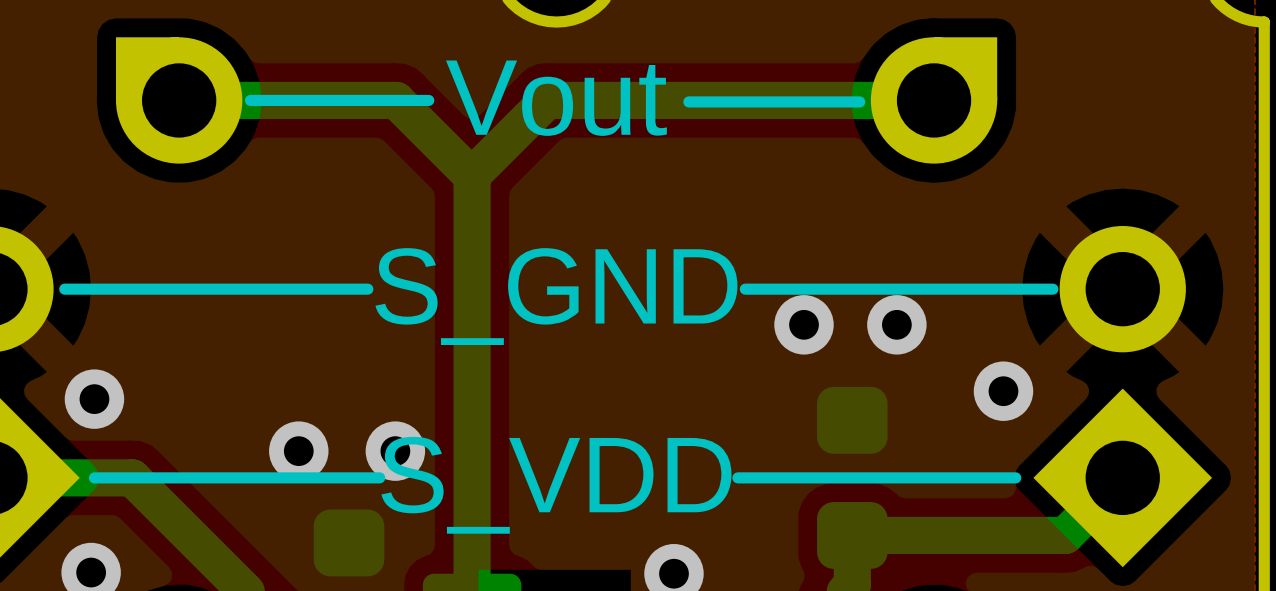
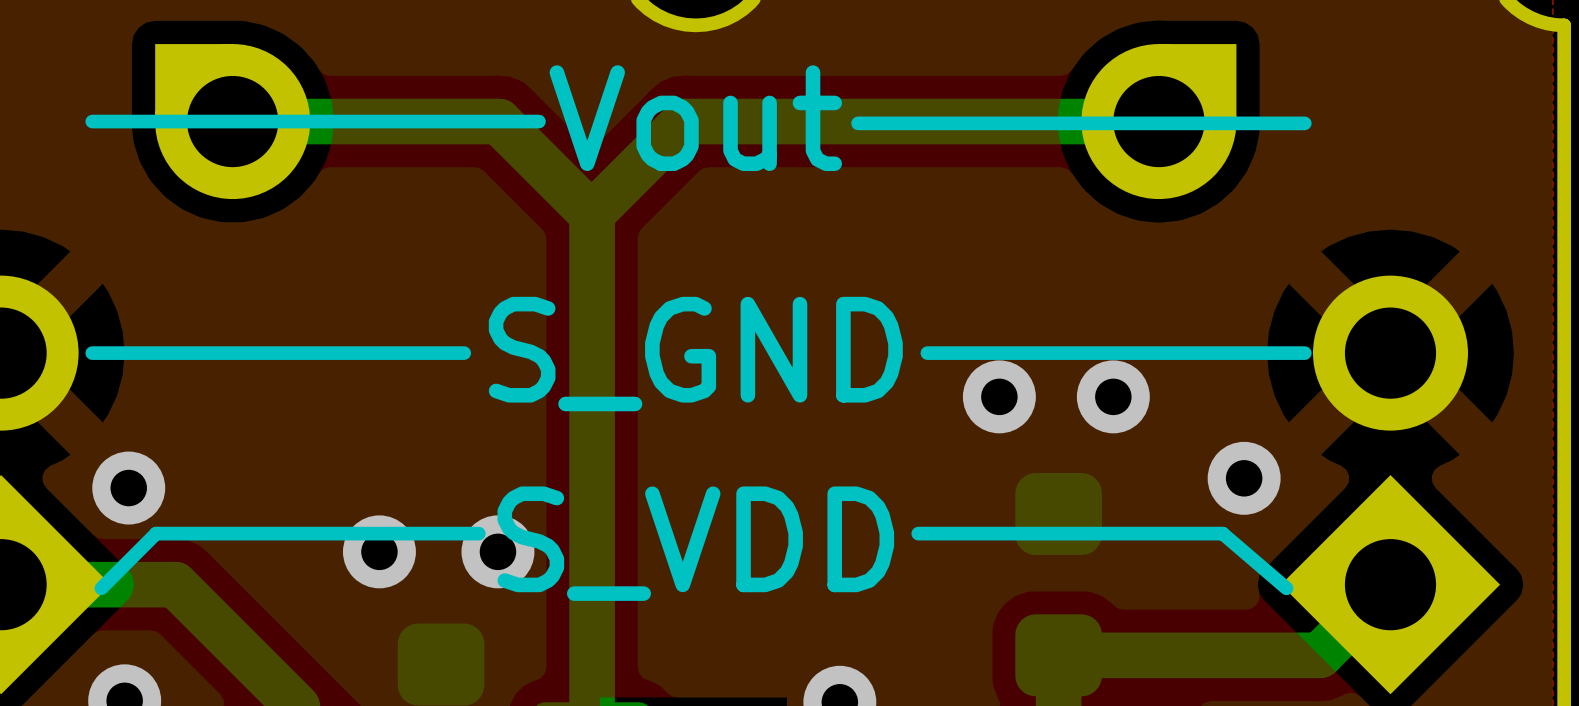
line: none -> (92, 121) (320, 121)
line: none -> (1067, 123) (1304, 123)
line: none -> (478, 533) (156, 533) (101, 588)
line: none -> (918, 533) (1222, 533) (1286, 588)
line: (94, 477) (379, 477) -> none
line: (737, 477) (1015, 477) -> none
text position: S_VDD (556, 485) -> S_VDD (695, 543)

